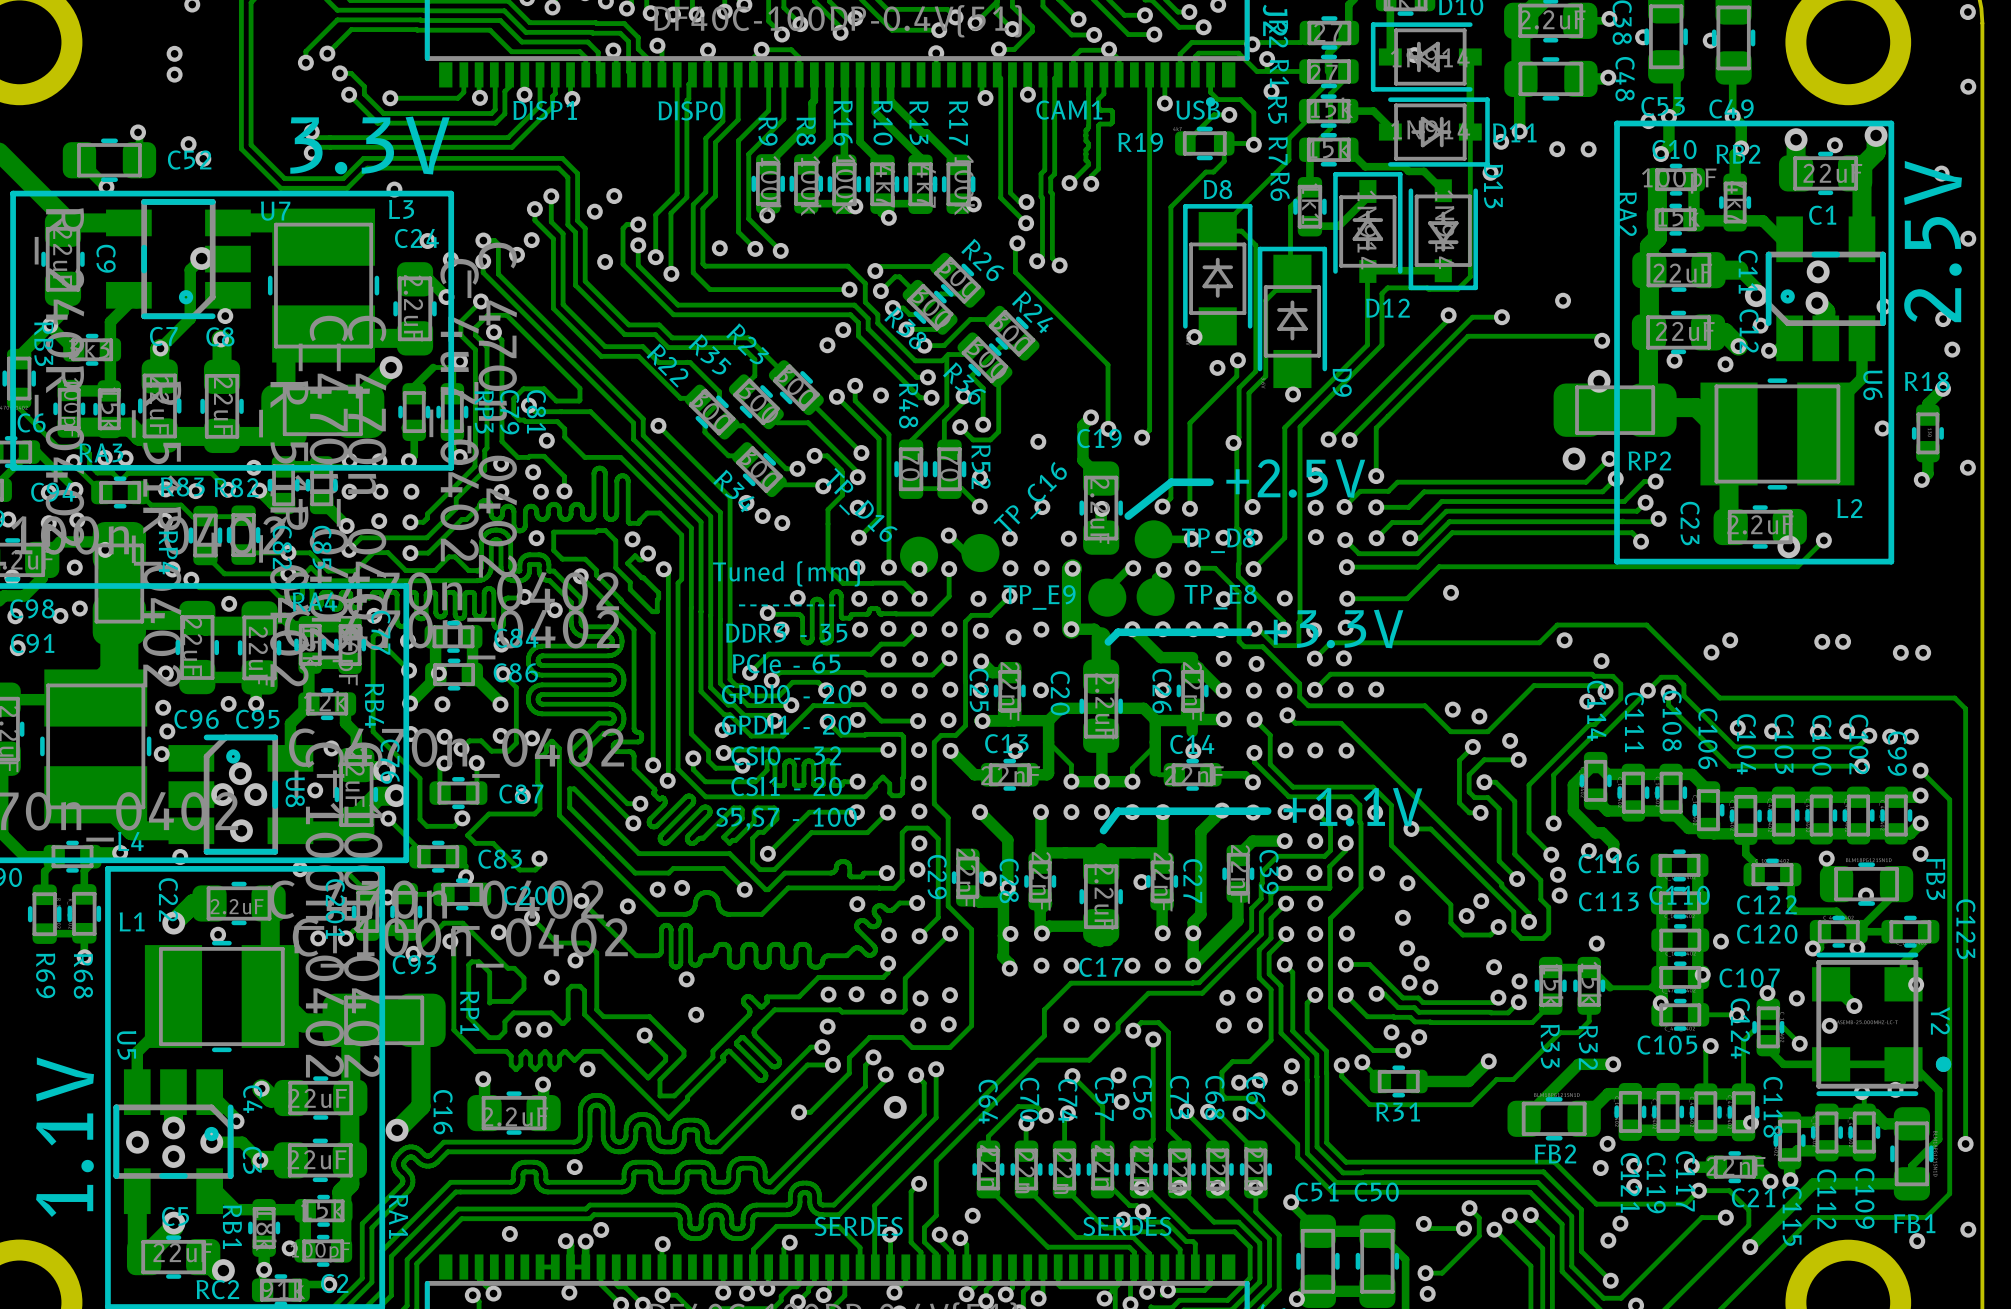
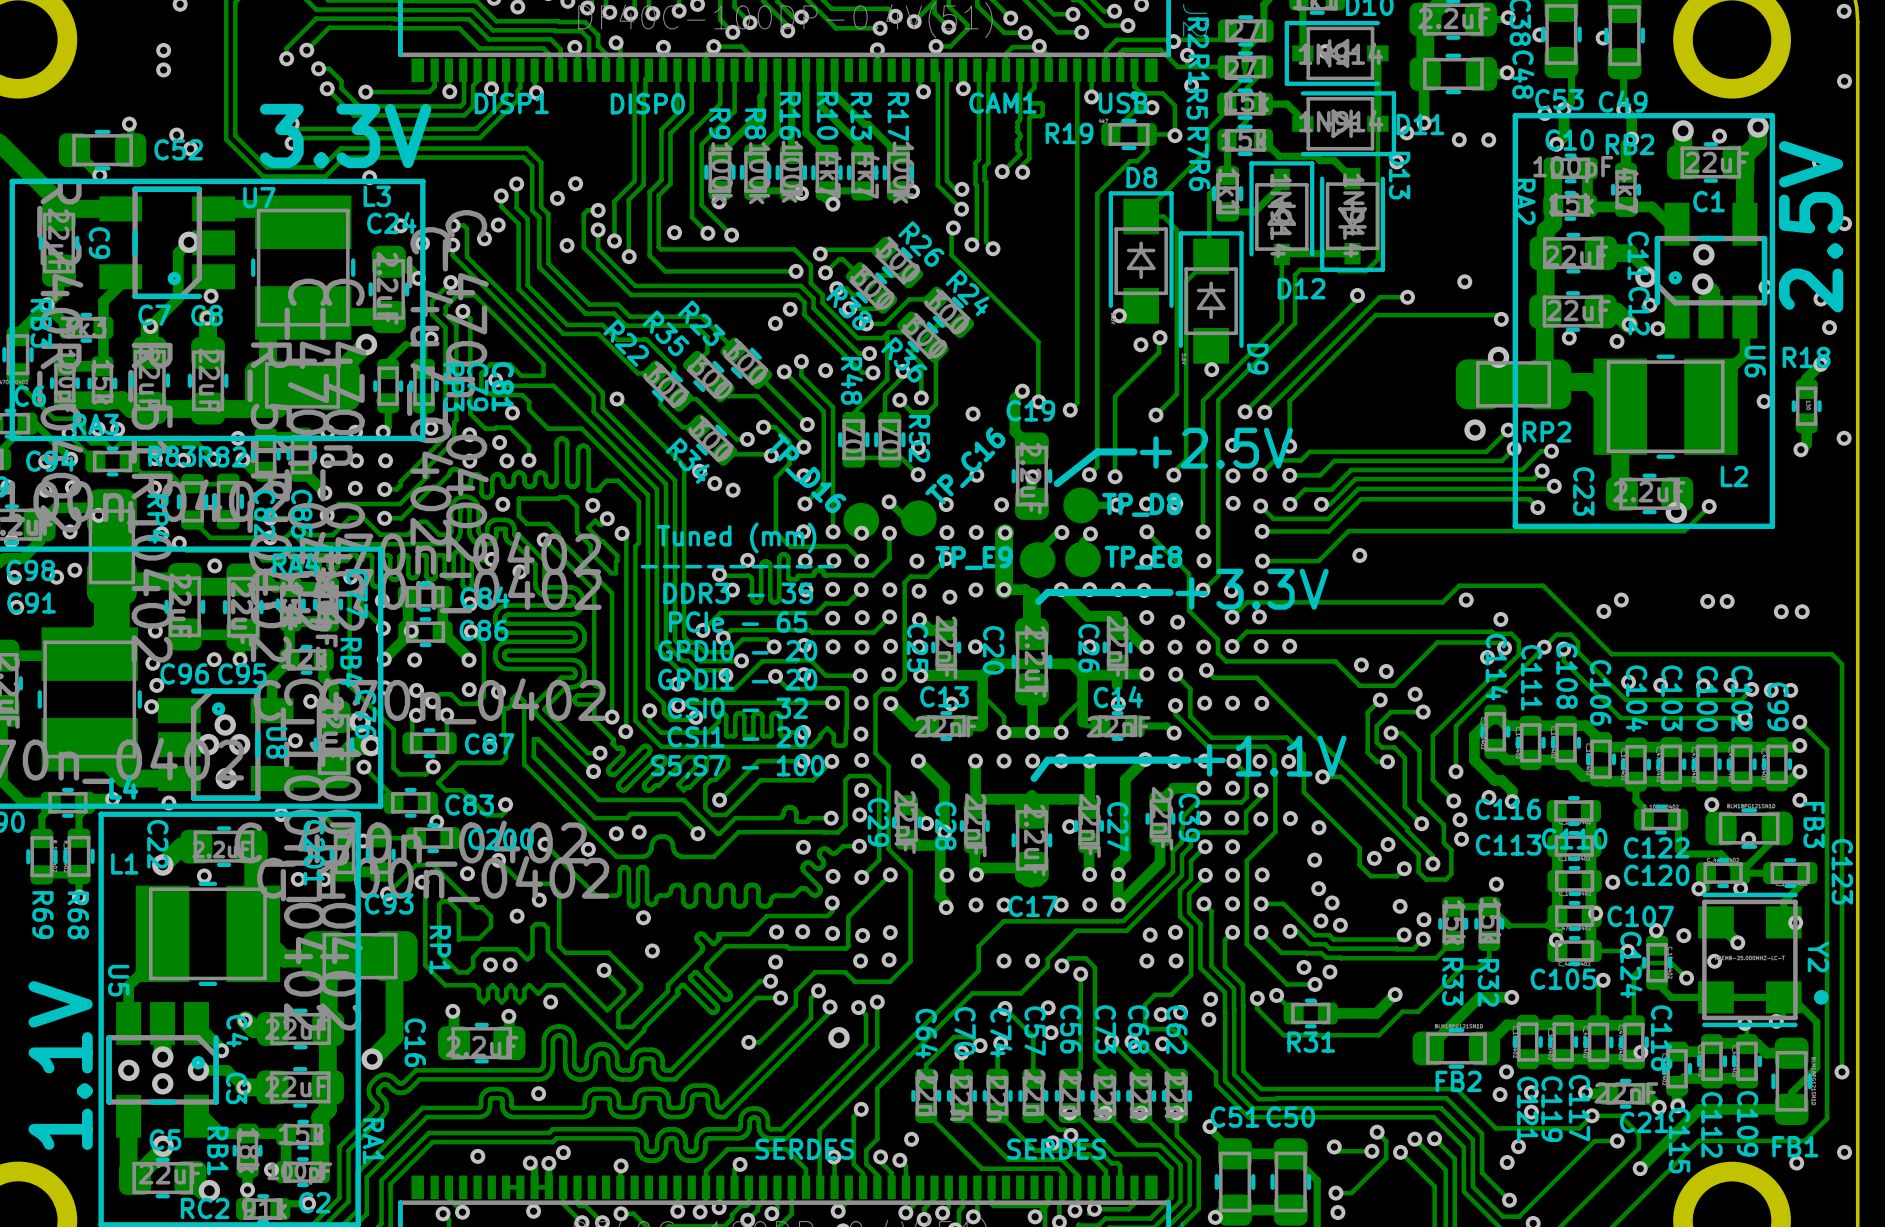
track: (1367, 271) (1367, 345) (1284, 427) (1284, 537) (1253, 569) -> (1281, 254) (1281, 321) (1203, 400) (1203, 531)
track: (1255, 371) (1239, 388) (1239, 437) -> (1176, 347) (1176, 394) (1161, 409)
track: (1265, 376) (1248, 393) (1248, 503) (1252, 506) -> (1186, 352) (1186, 459) (1172, 473)
track: (1233, 442) (1236, 446) (1238, 576) (1283, 621) (1283, 629) -> none
via: none -> (1146, 531)
via: none -> (1203, 531)
track: (1192, 568) (1215, 568) (1239, 592) (1239, 641) (1244, 646) (1262, 646) (1299, 683) -> (1146, 531) (1189, 573) (1189, 610) (1217, 640)
via: (1192, 568) -> none
via: (1253, 569) -> none
track: (1300, 614) (1298, 645) -> (1218, 575) (1203, 590)
track: (1254, 628) (1258, 628) (1275, 645) (1298, 645) -> none
via: (1254, 628) -> none

